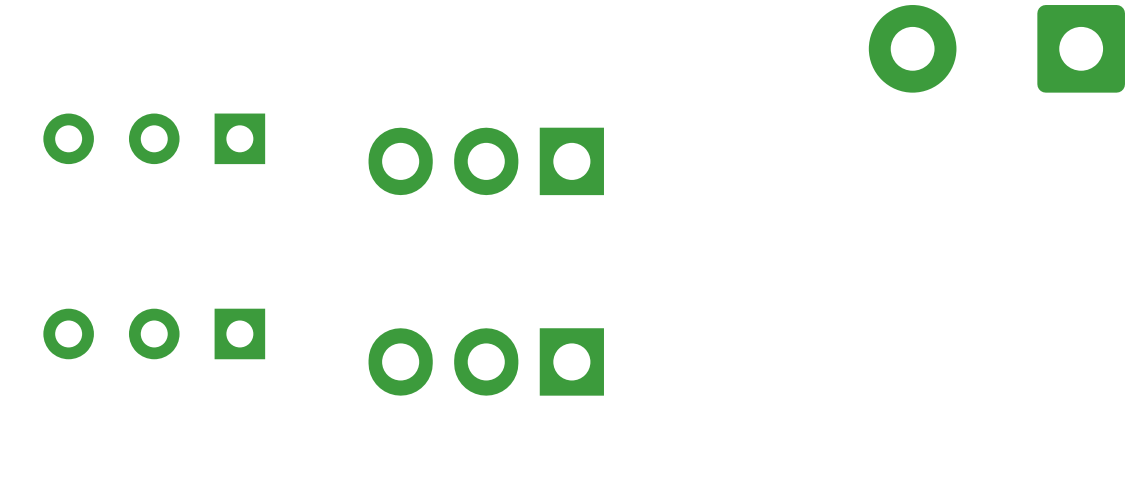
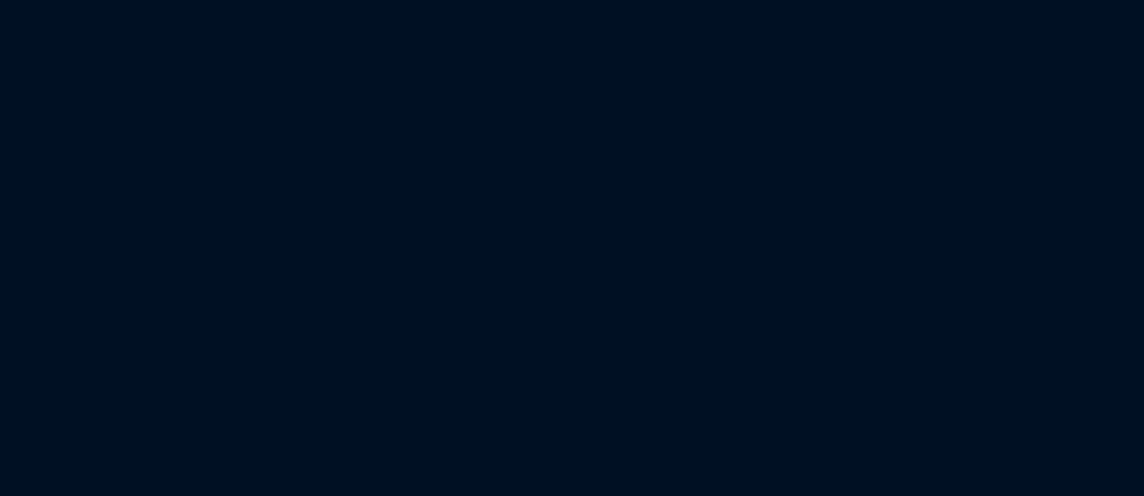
part: (996, 48) -> none
part: (154, 138) -> none
part: (486, 161) -> none
part: (154, 333) -> none
part: (486, 361) -> none

